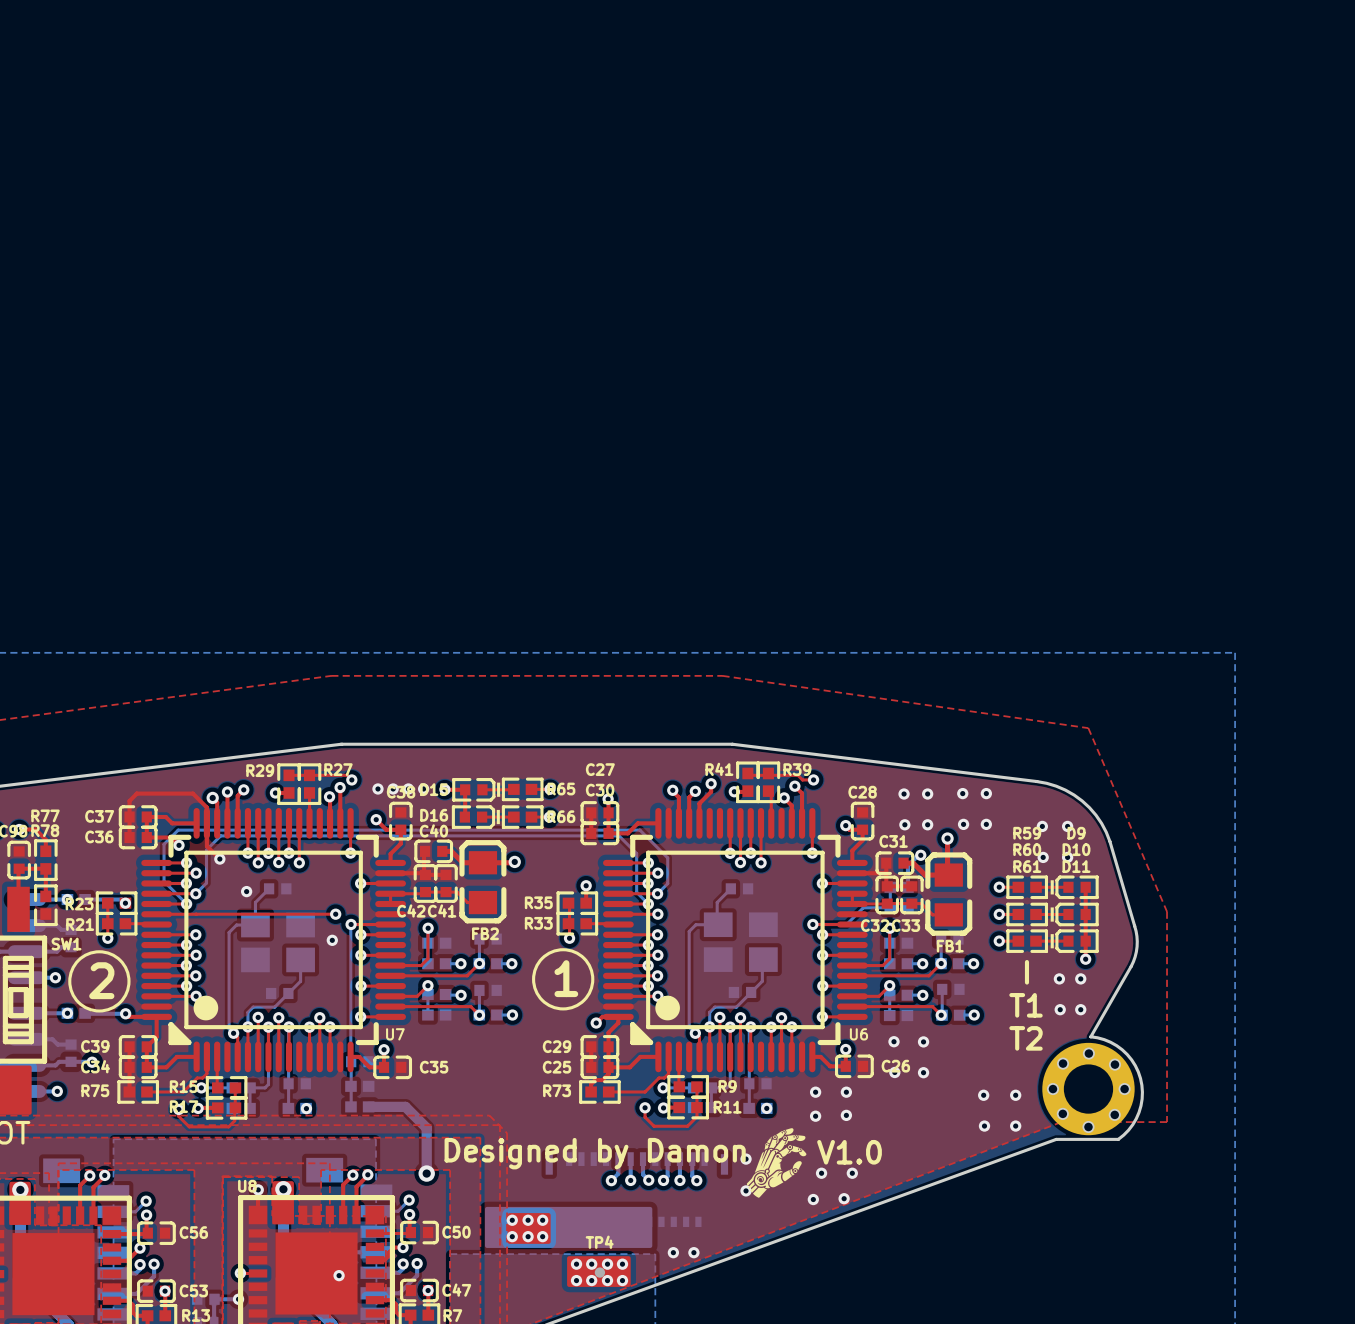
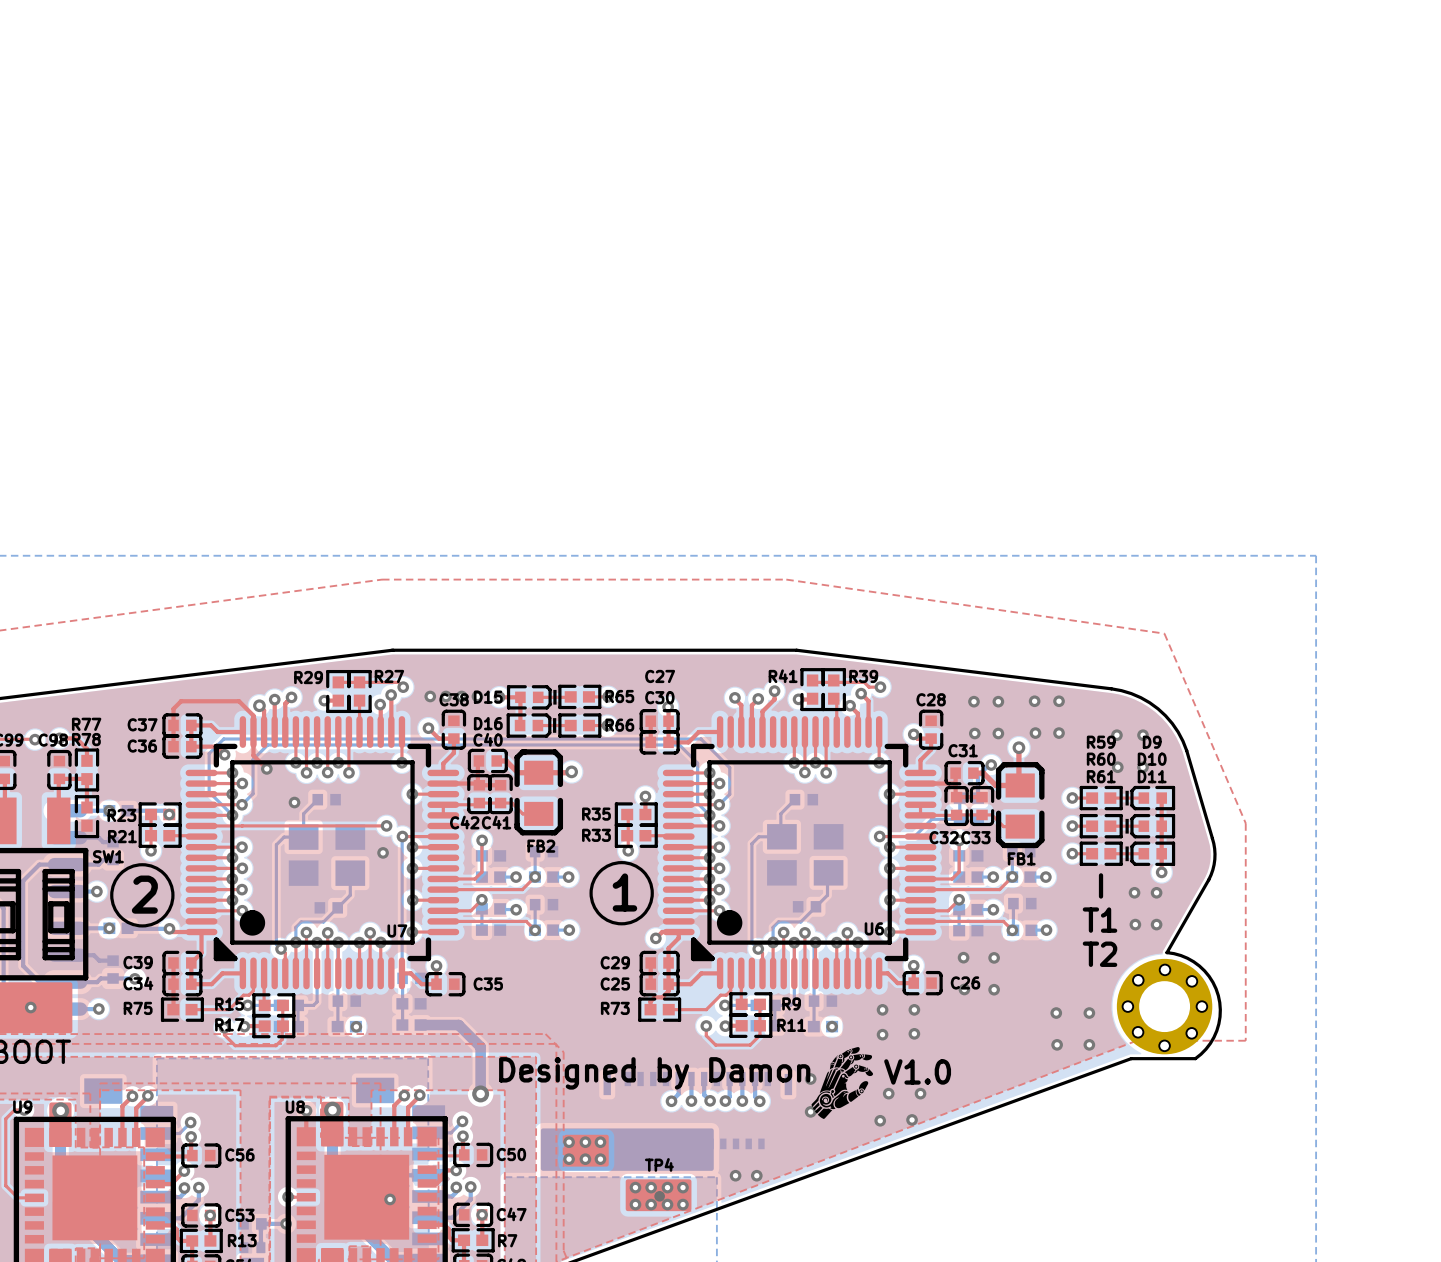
U7 name position: U7 (395, 1034) -> U7 (397, 930)
U6 name position: U6 (858, 1034) -> U6 (874, 928)

